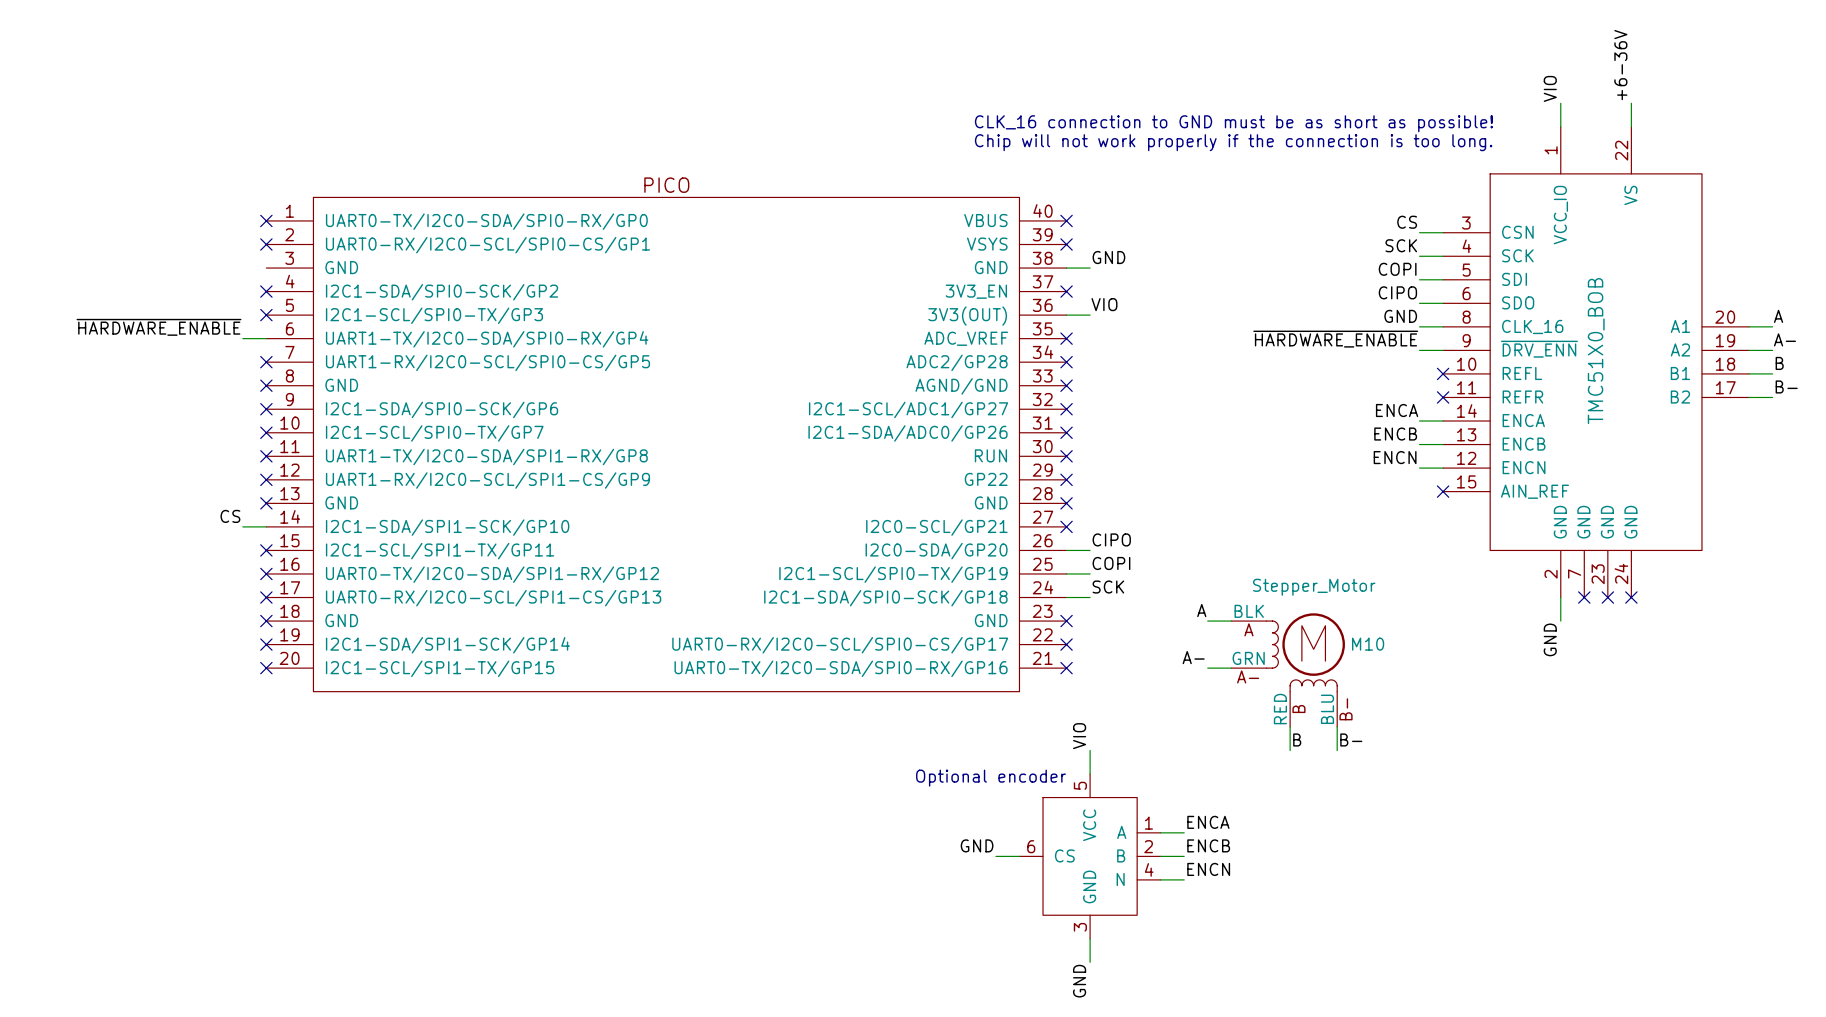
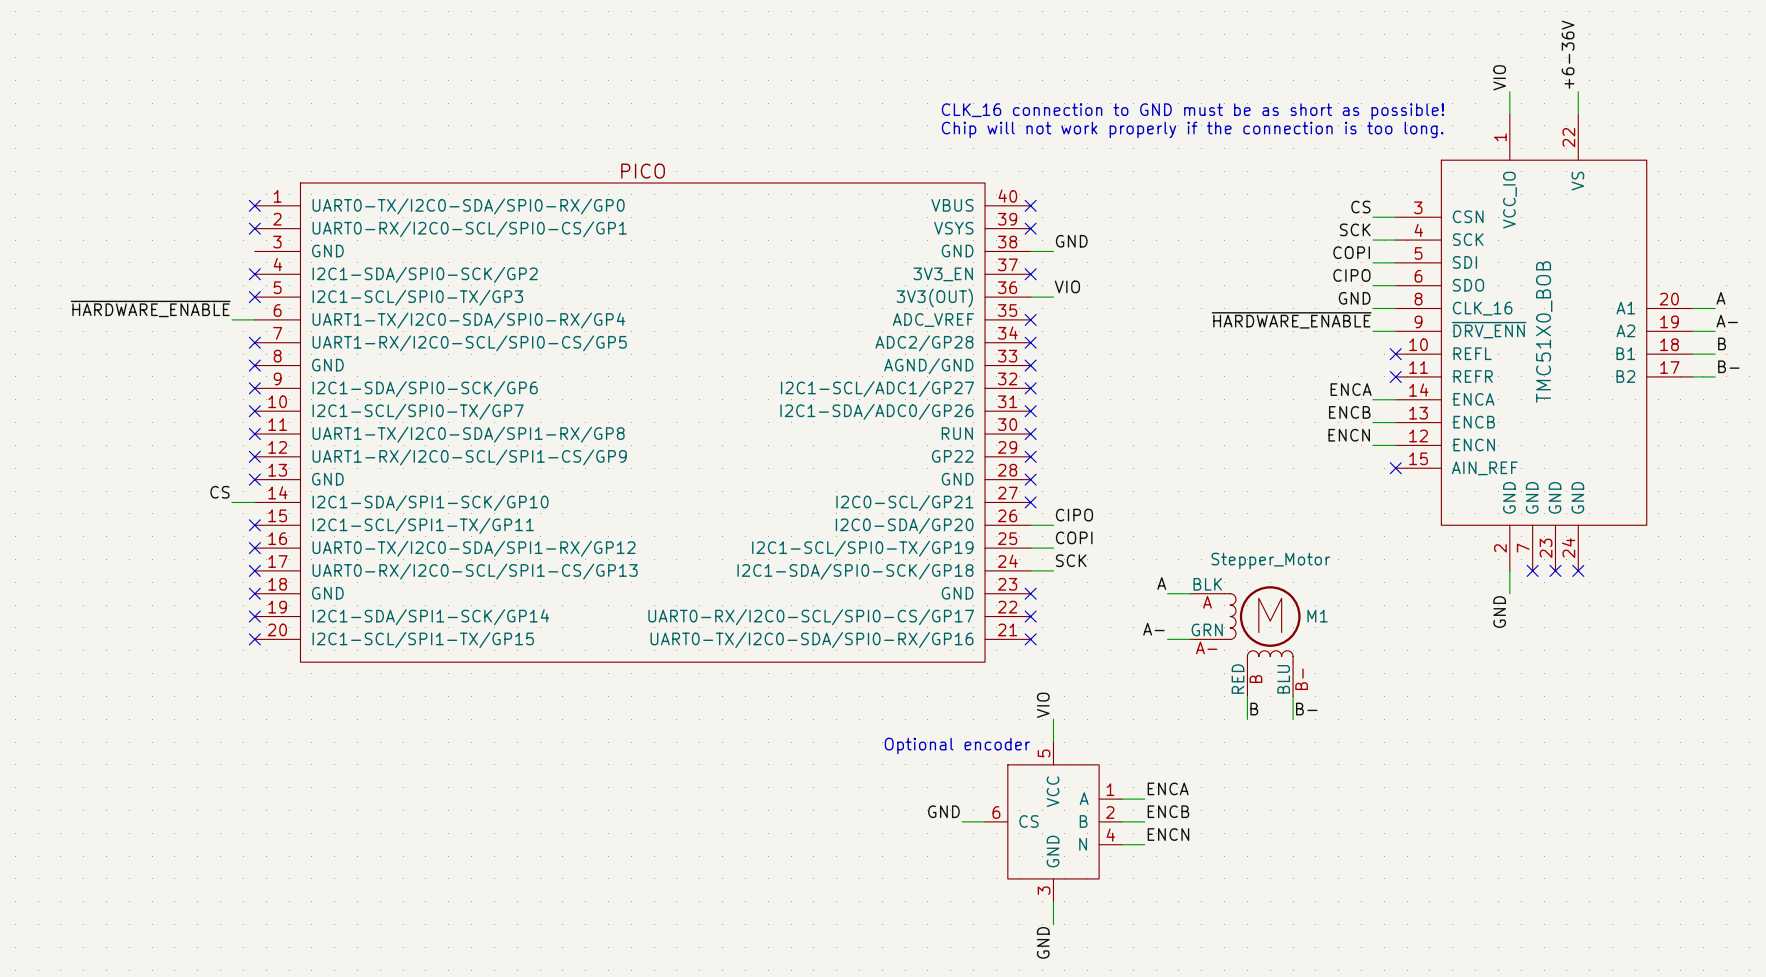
M10 name: M10 (1368, 644) -> M1 (1317, 616)

